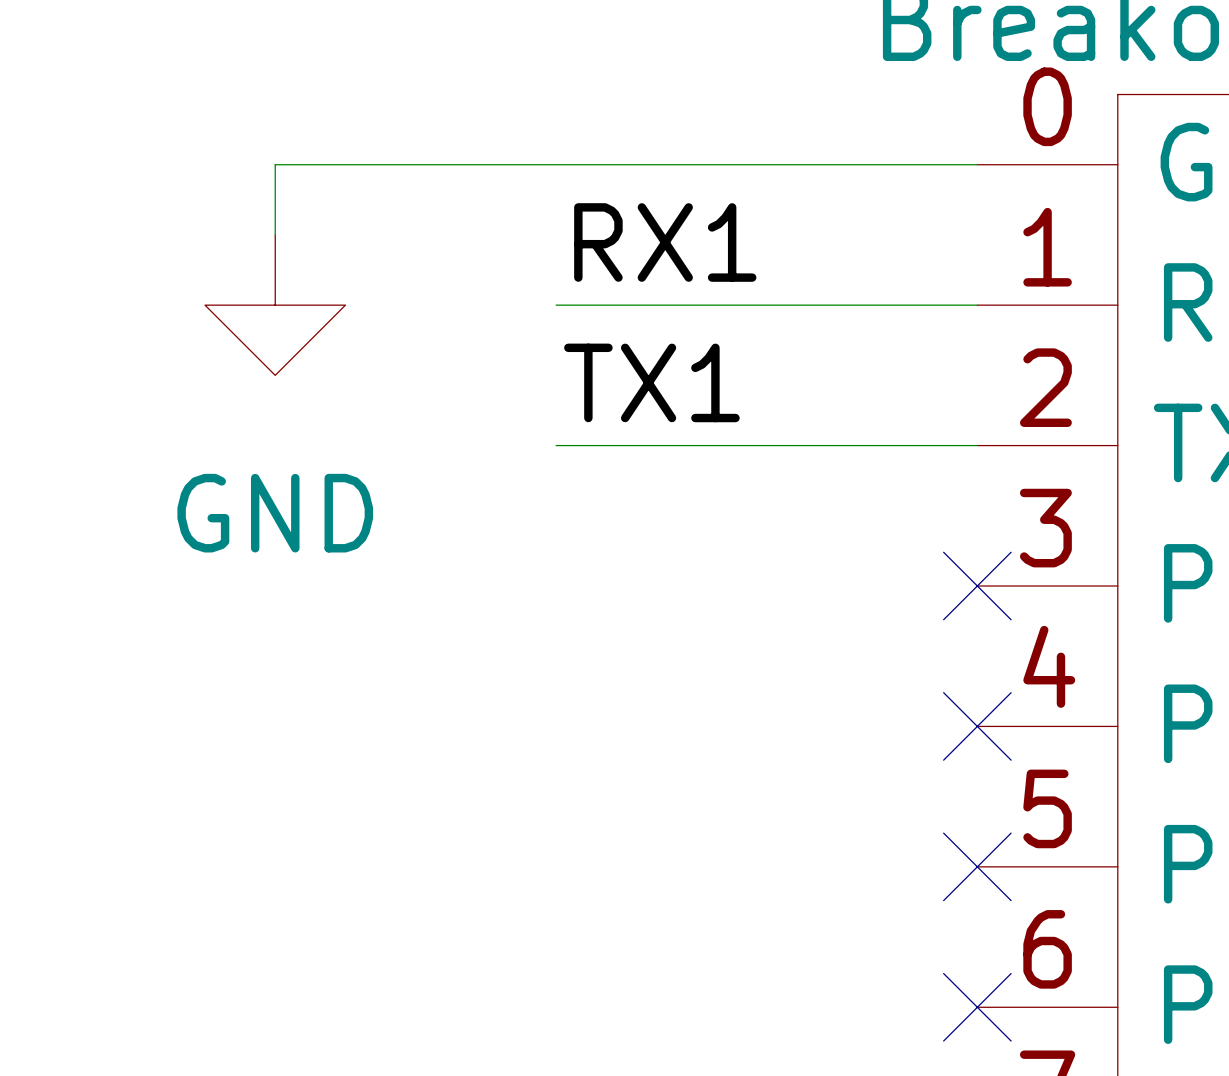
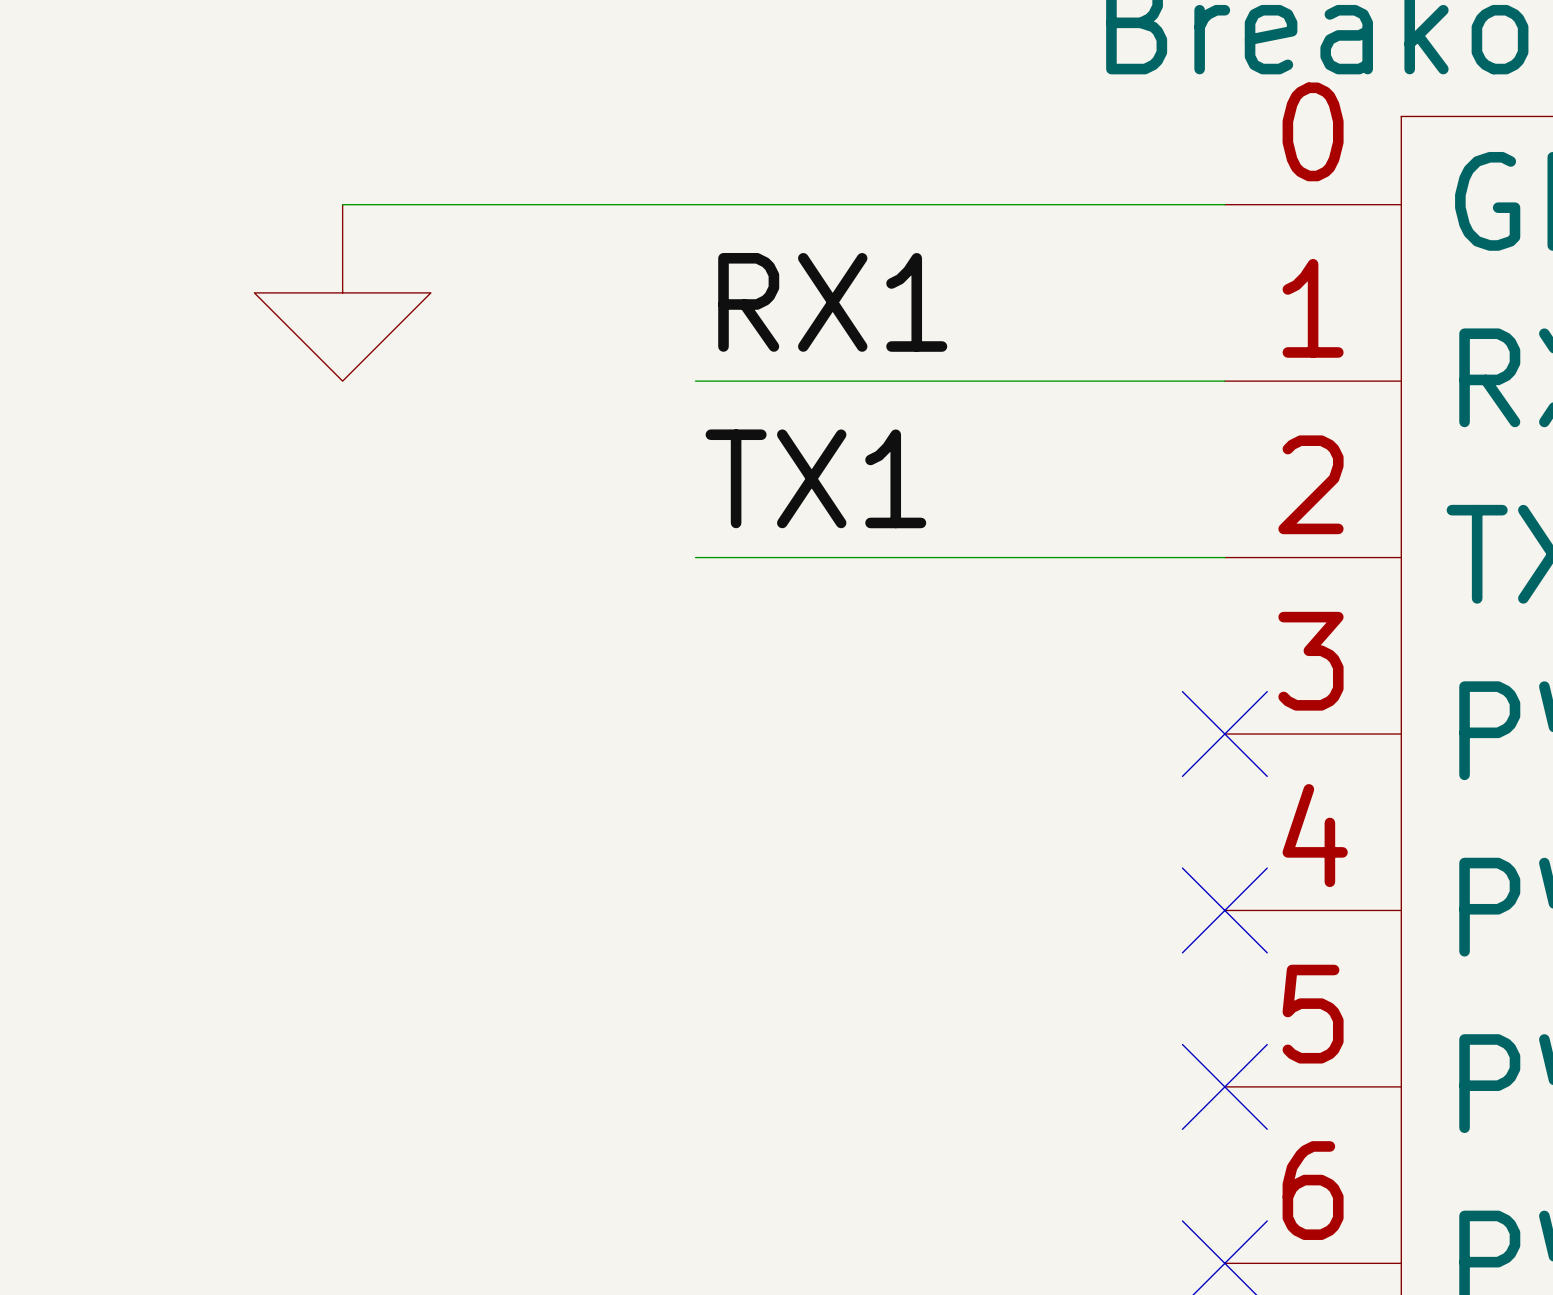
power symbol: none -> (342, 292)
power symbol: GND (275, 305) -> none

